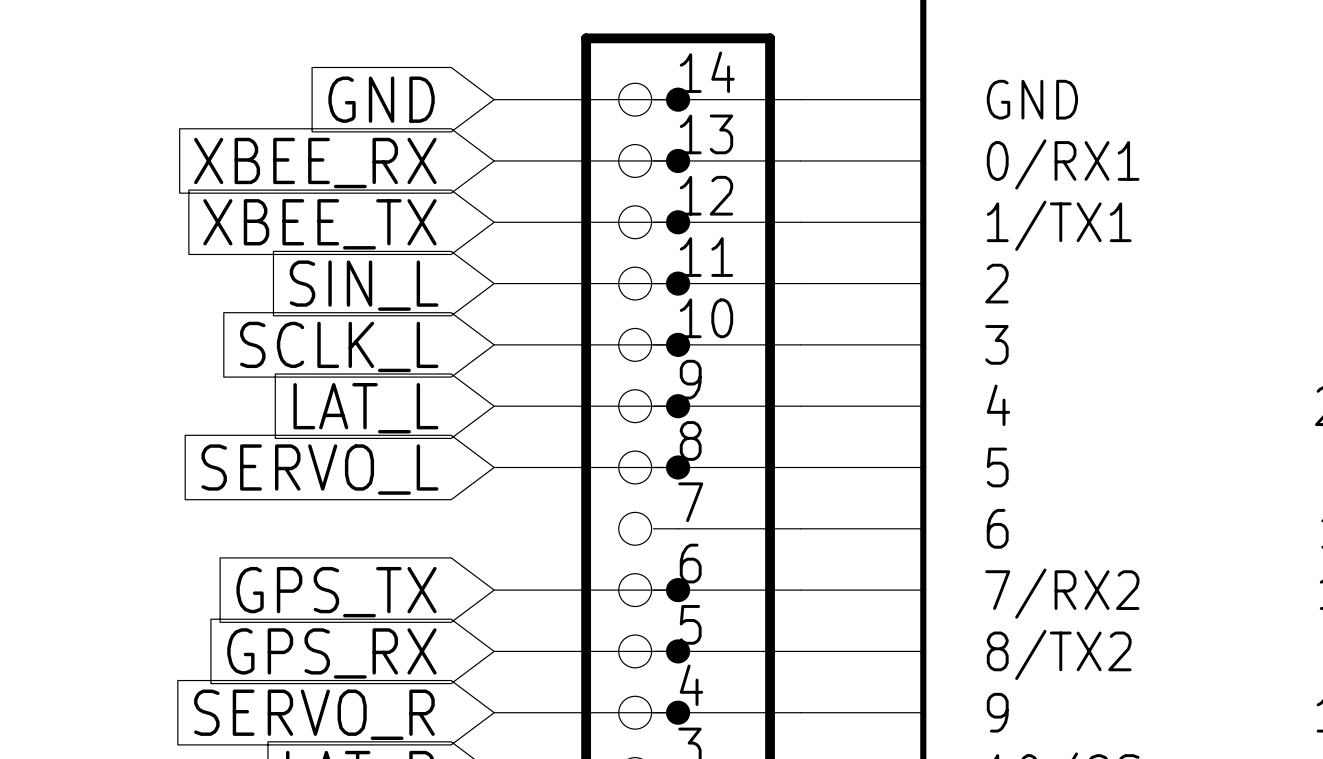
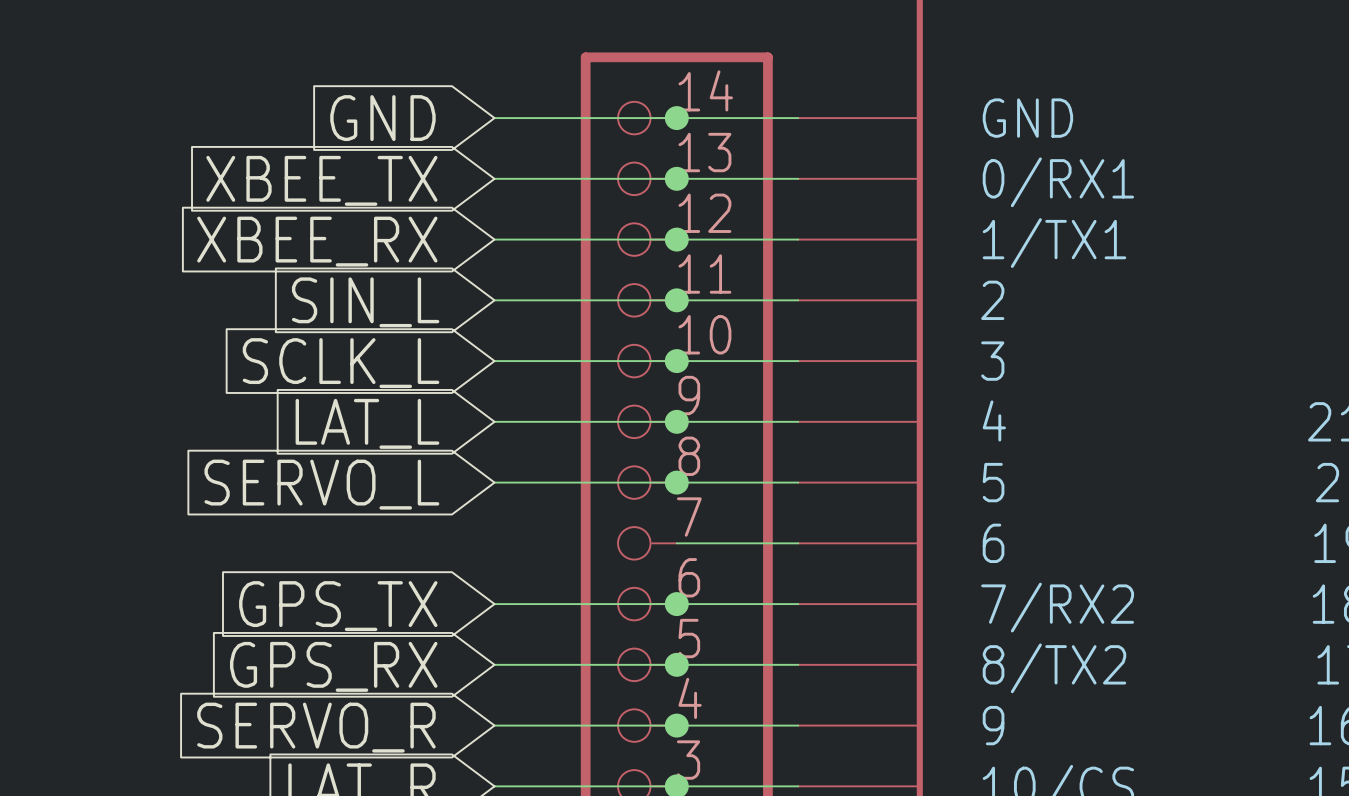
global label: XBEE_RX (315, 163) -> XBEE_TX (321, 180)
global label: XBEE_TX (319, 224) -> XBEE_RX (317, 241)

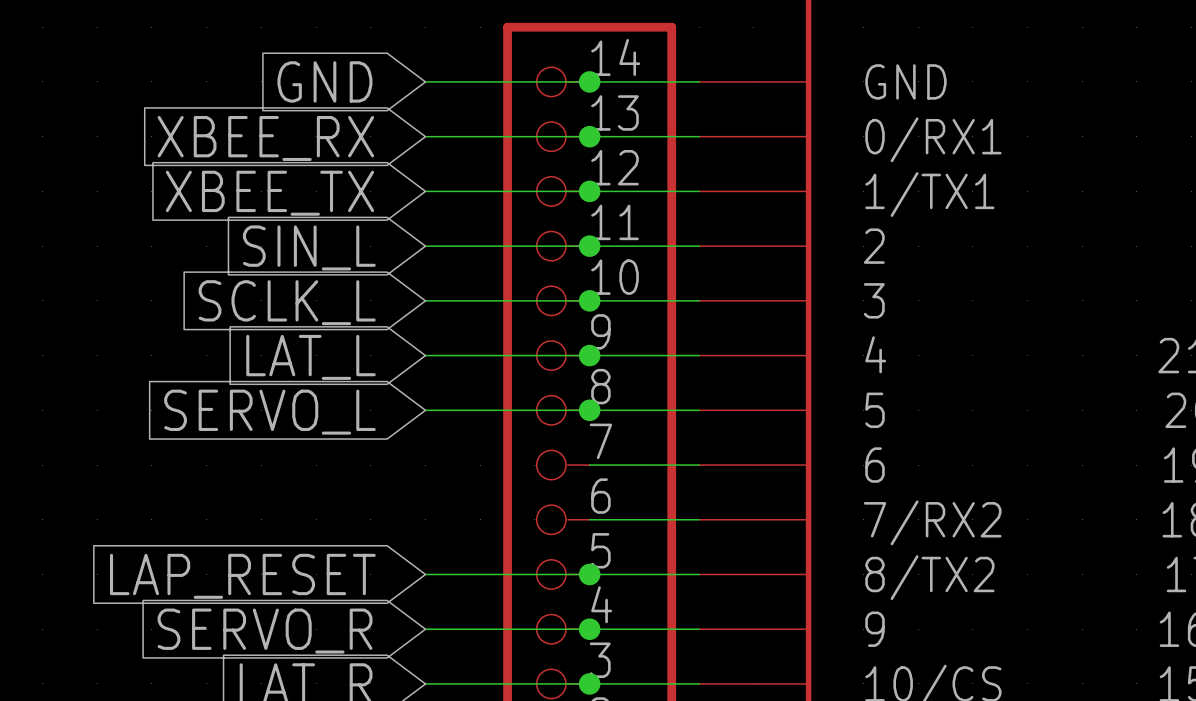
global label: XBEE_TX (321, 180) -> XBEE_RX (265, 138)
global label: XBEE_RX (317, 241) -> XBEE_TX (269, 193)
wire: (494, 604) (676, 604) -> none
junction: (676, 604) -> none
global label: GPS_TX (338, 606) -> none
global label: GPS_RX (333, 666) -> LAP_RESET (242, 576)

